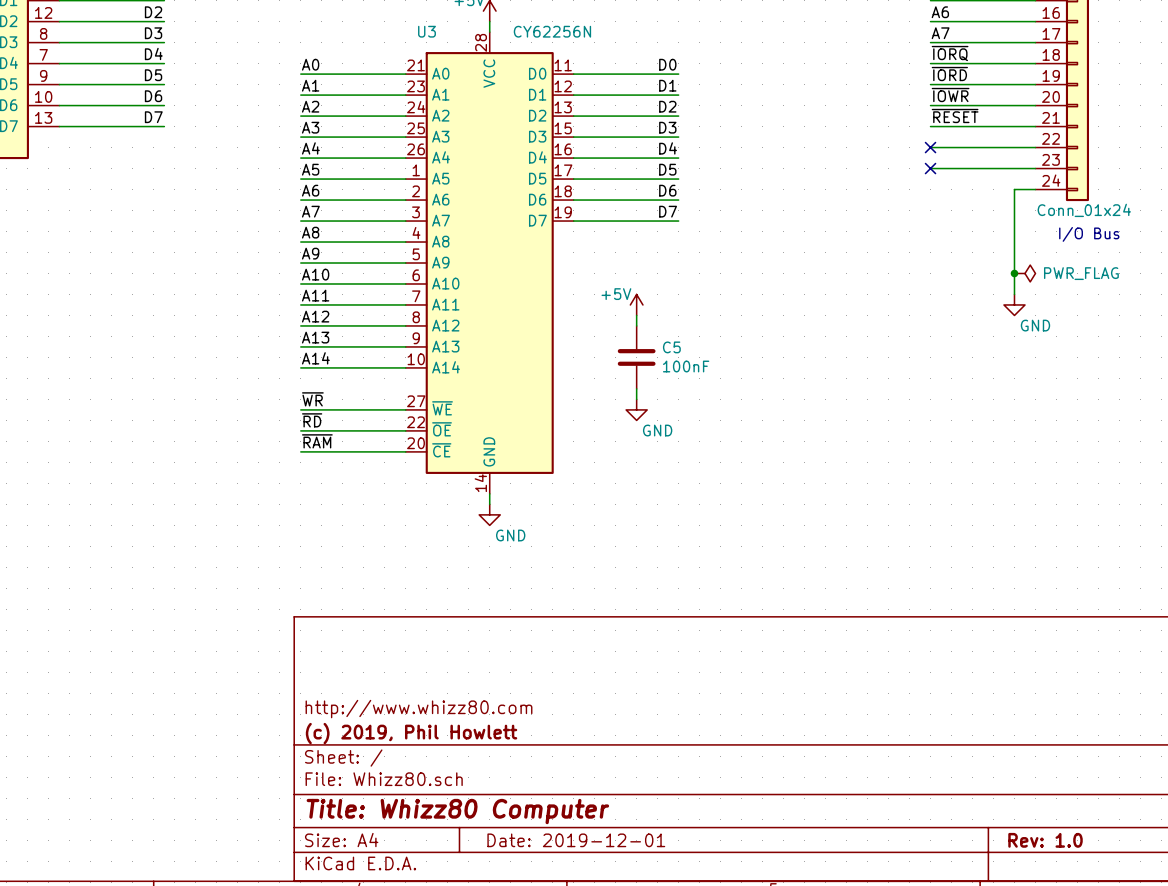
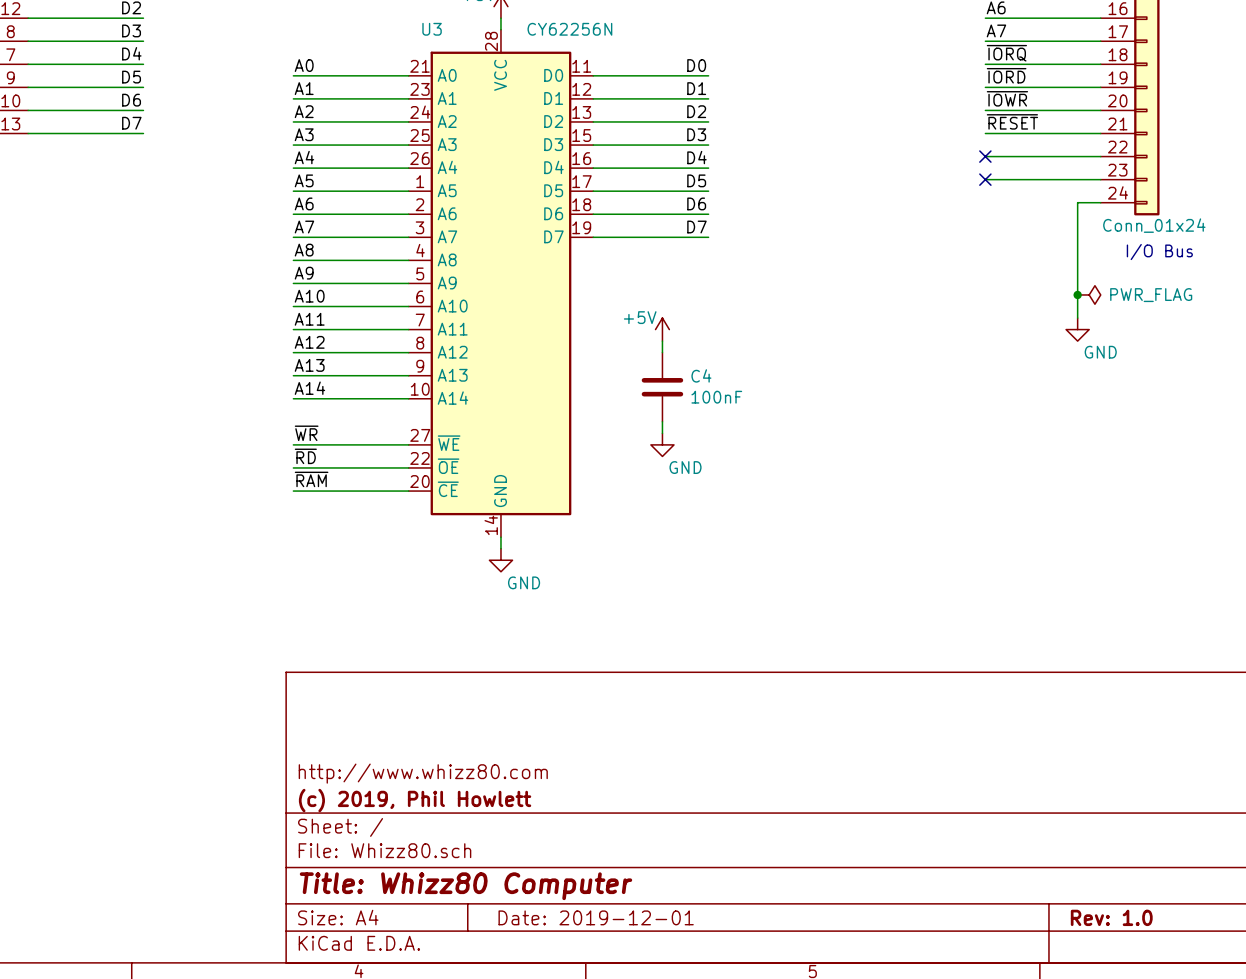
C5 name: C5 (671, 347) -> C4 (701, 375)

